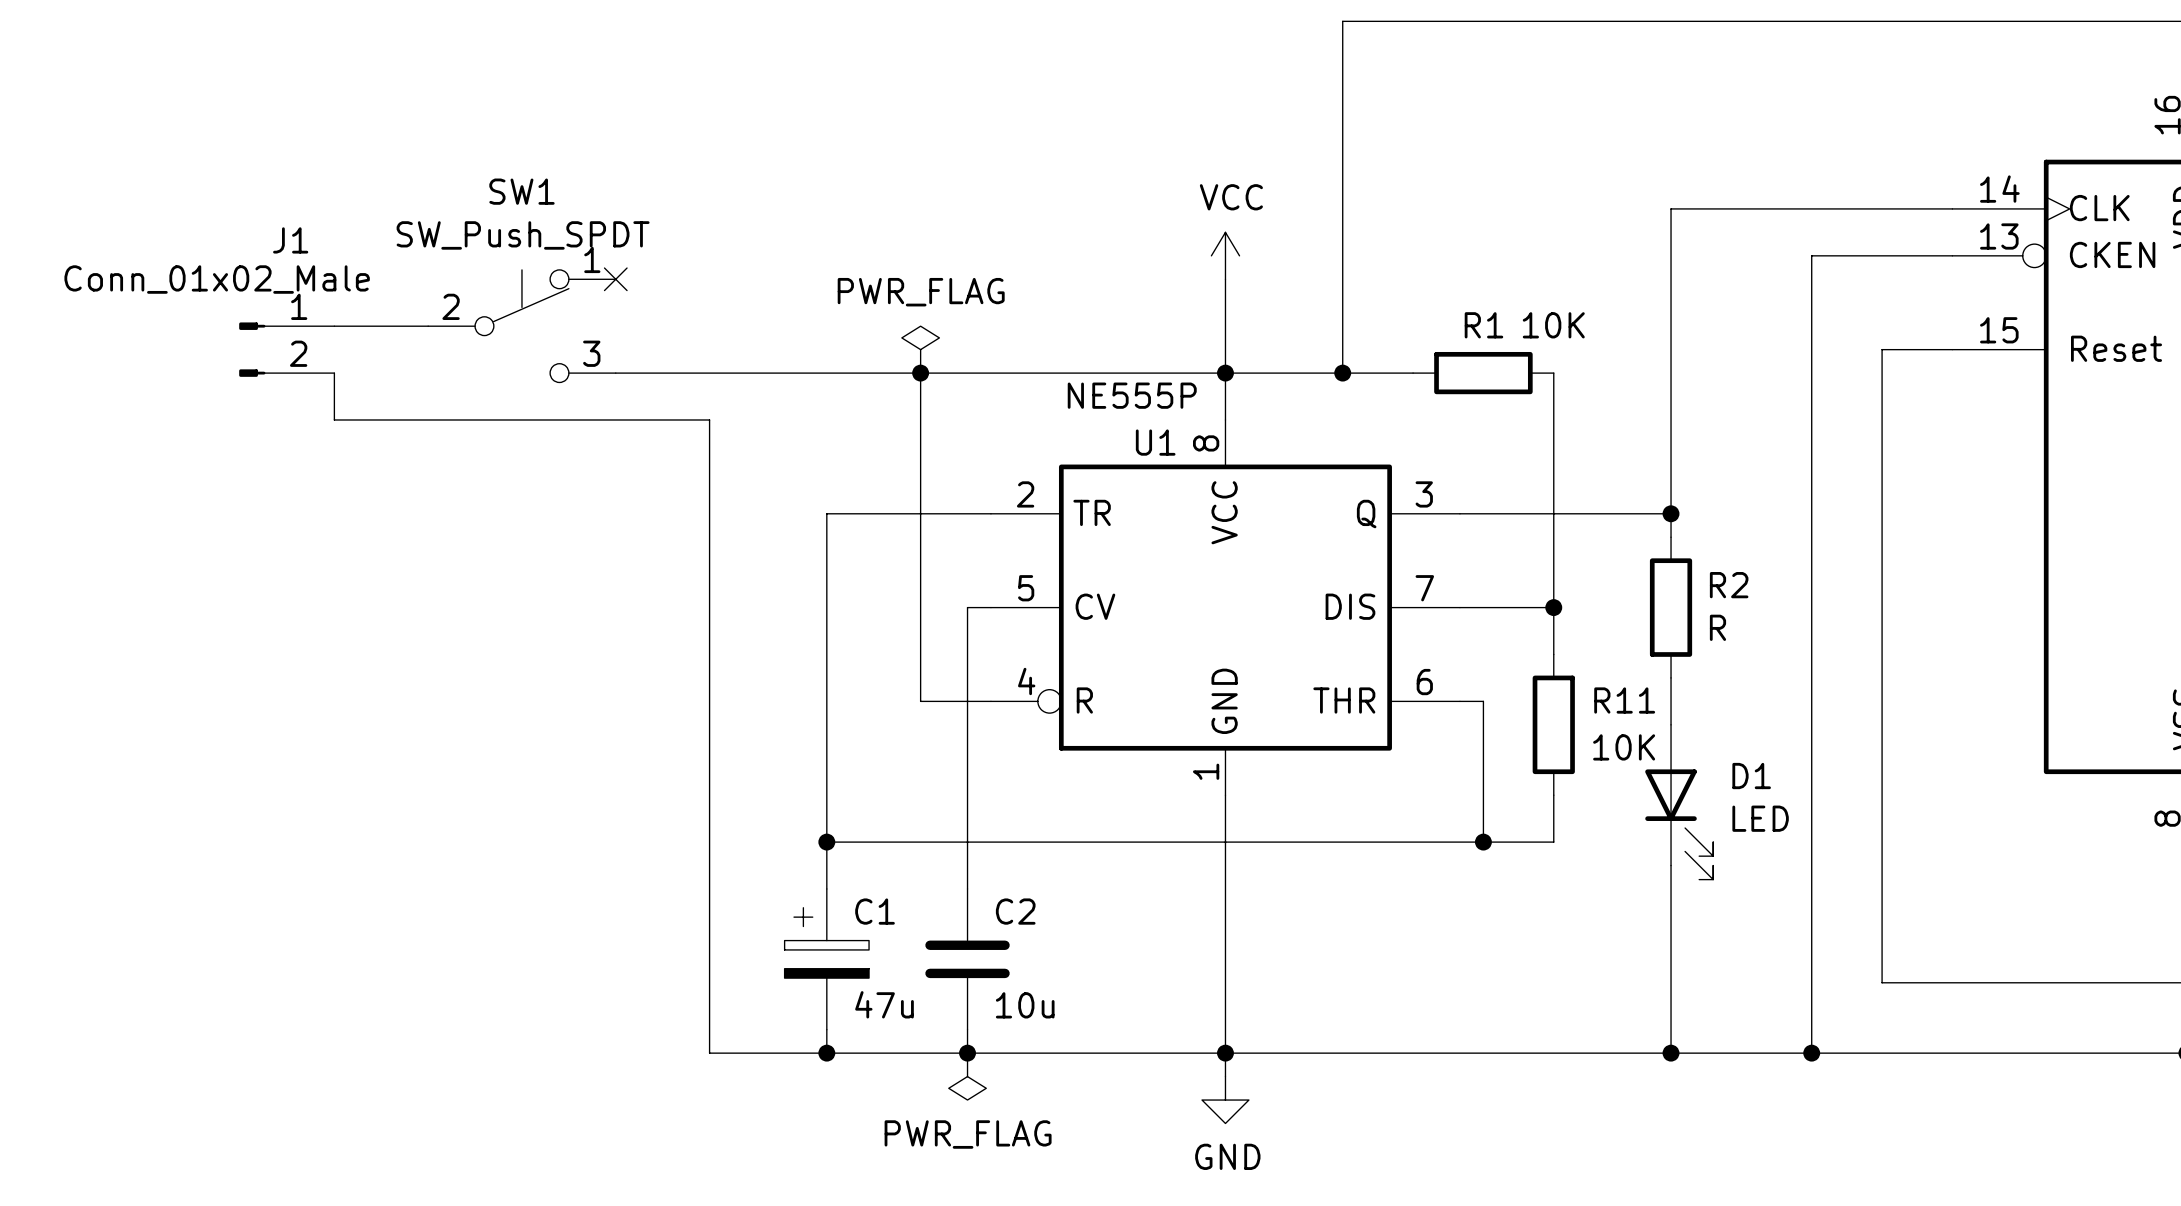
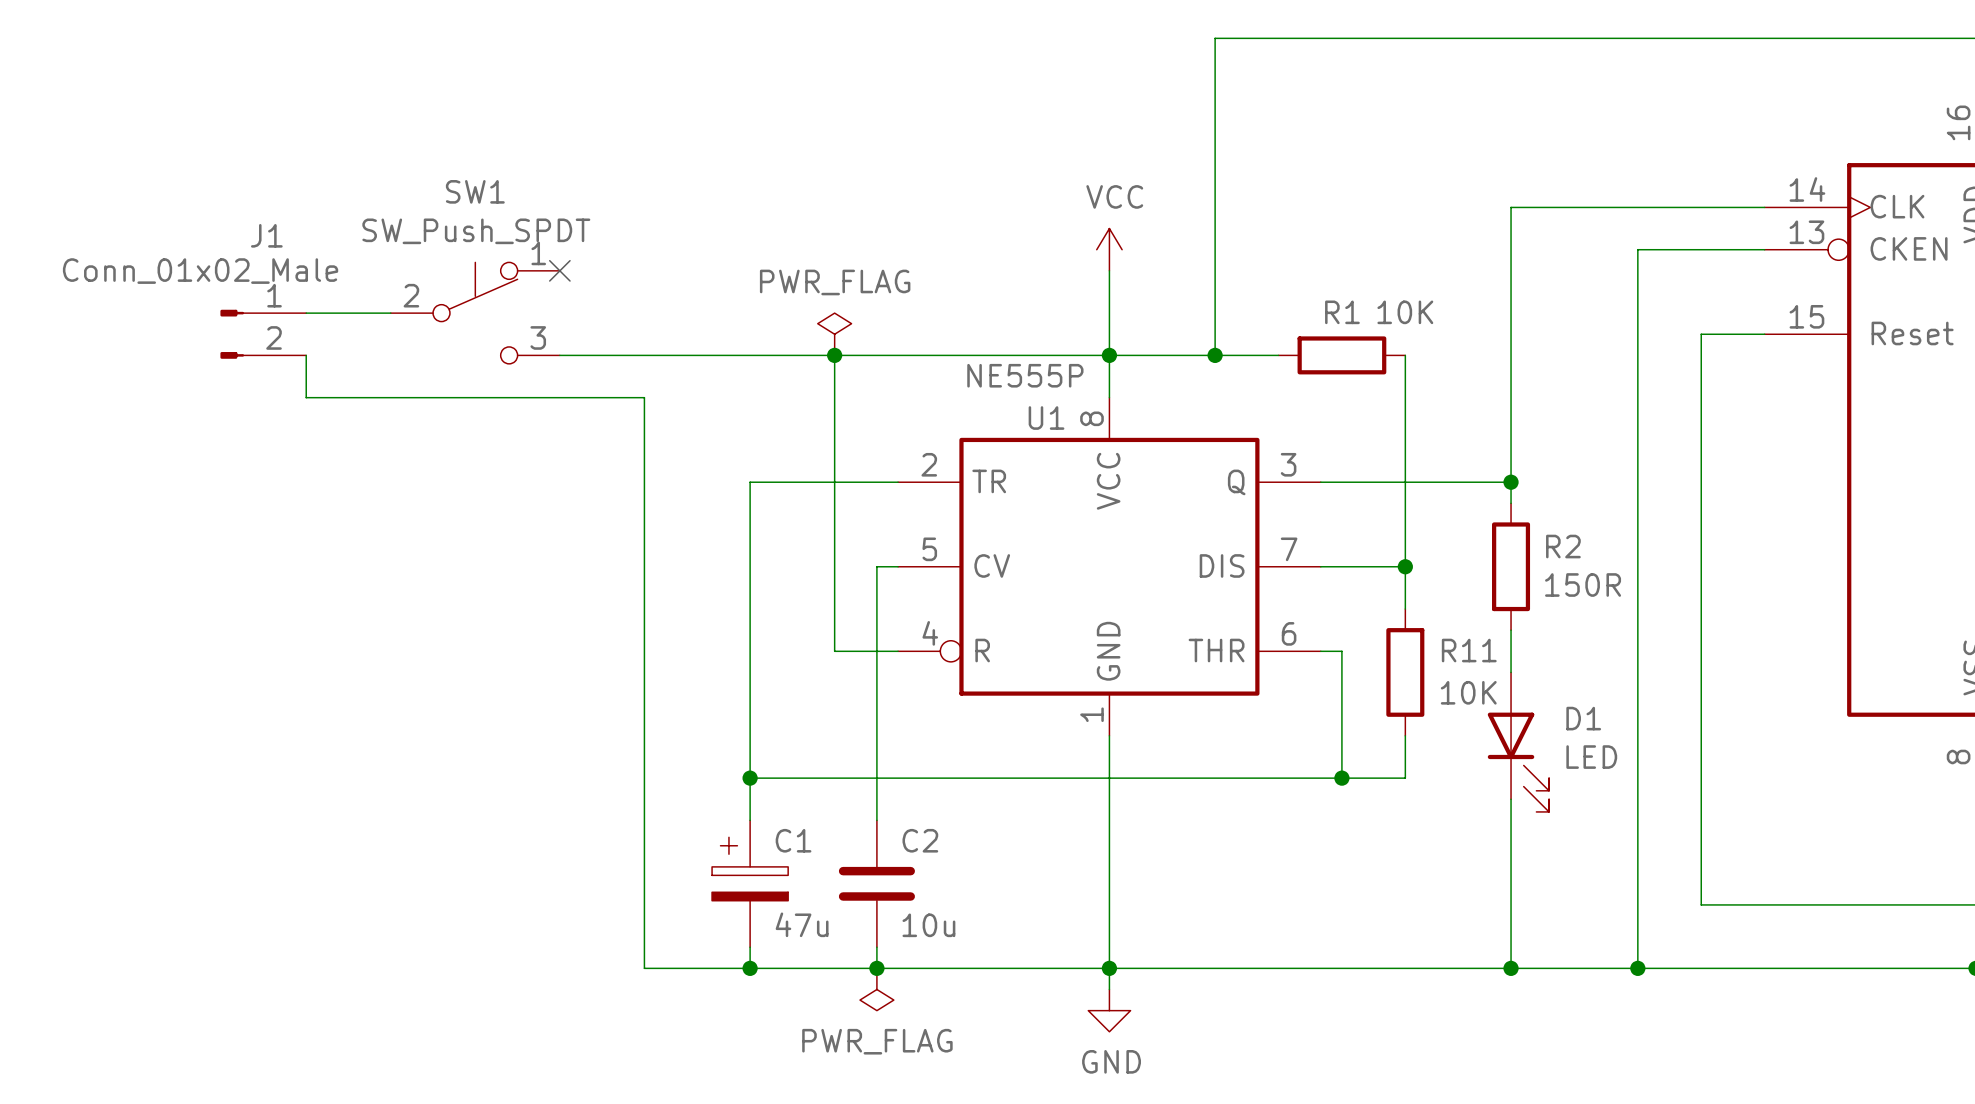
R2 value: R (1717, 627) -> 150R (1583, 585)

